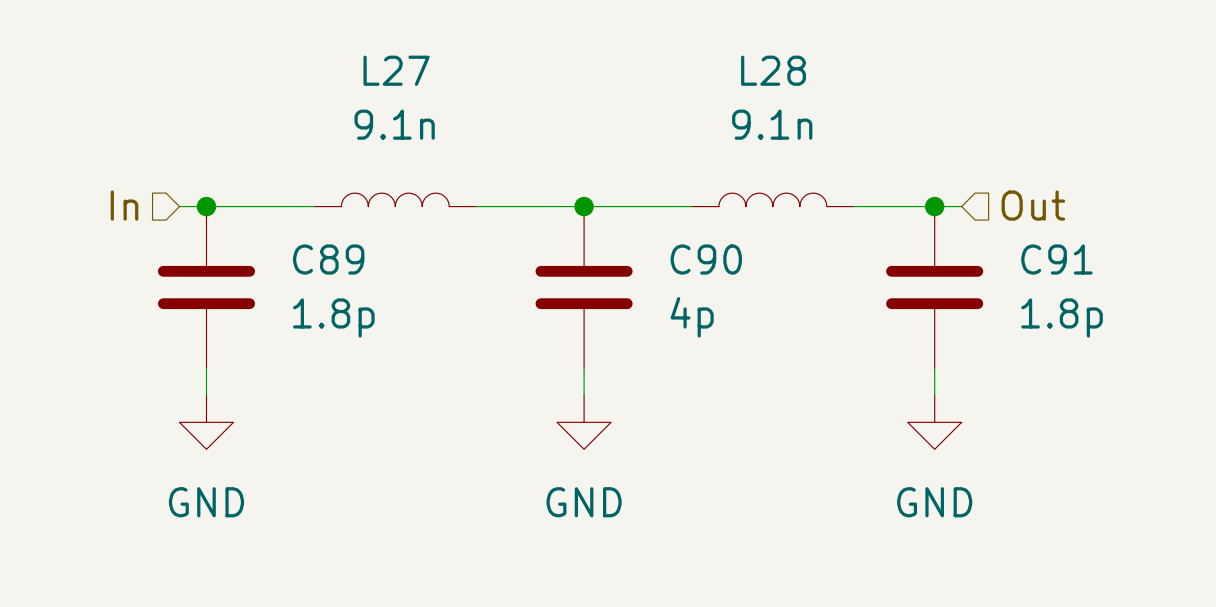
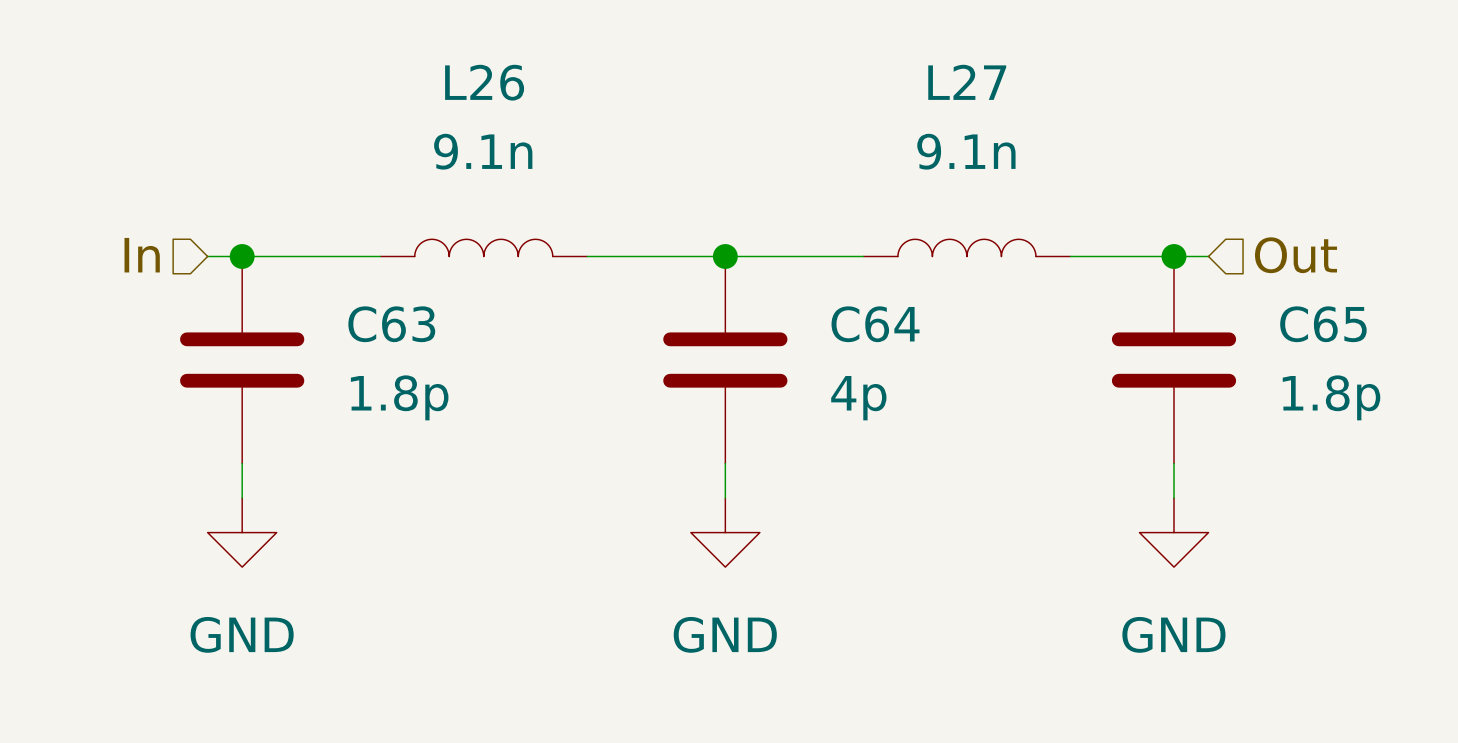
L27 name: L27 (396, 70) -> L26 (484, 82)
L28 name: L28 (773, 70) -> L27 (967, 82)
C89 name: C89 (328, 259) -> C63 (391, 324)
C90 name: C90 (706, 259) -> C64 (875, 324)
C91 name: C91 (1056, 259) -> C65 (1323, 324)

